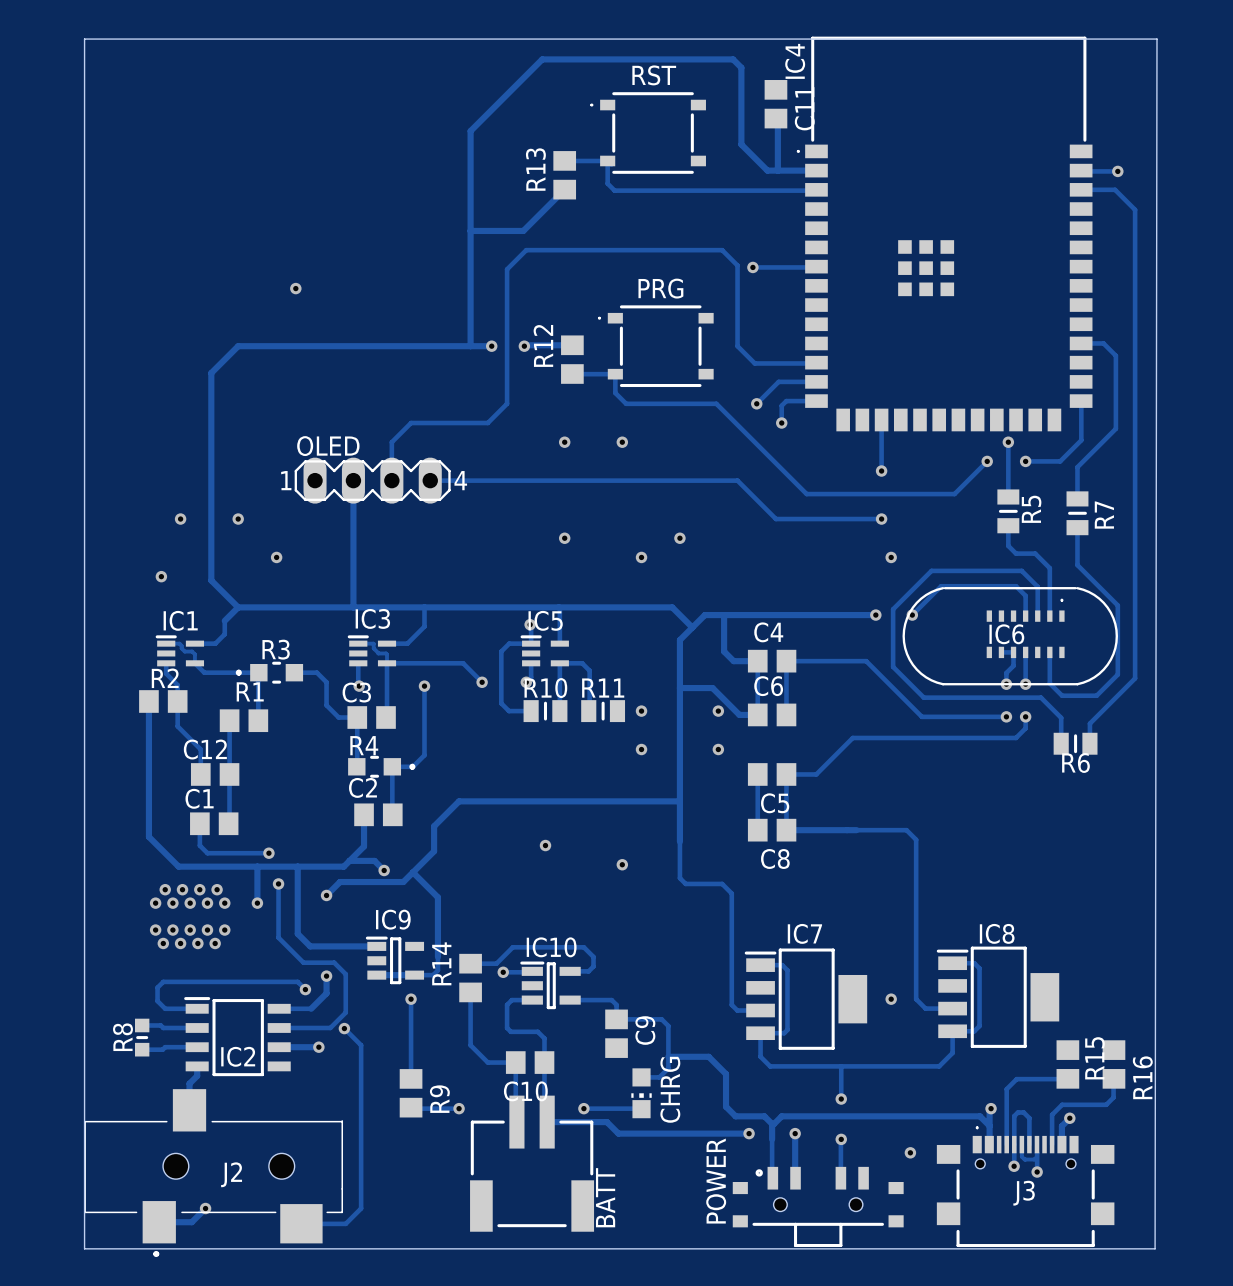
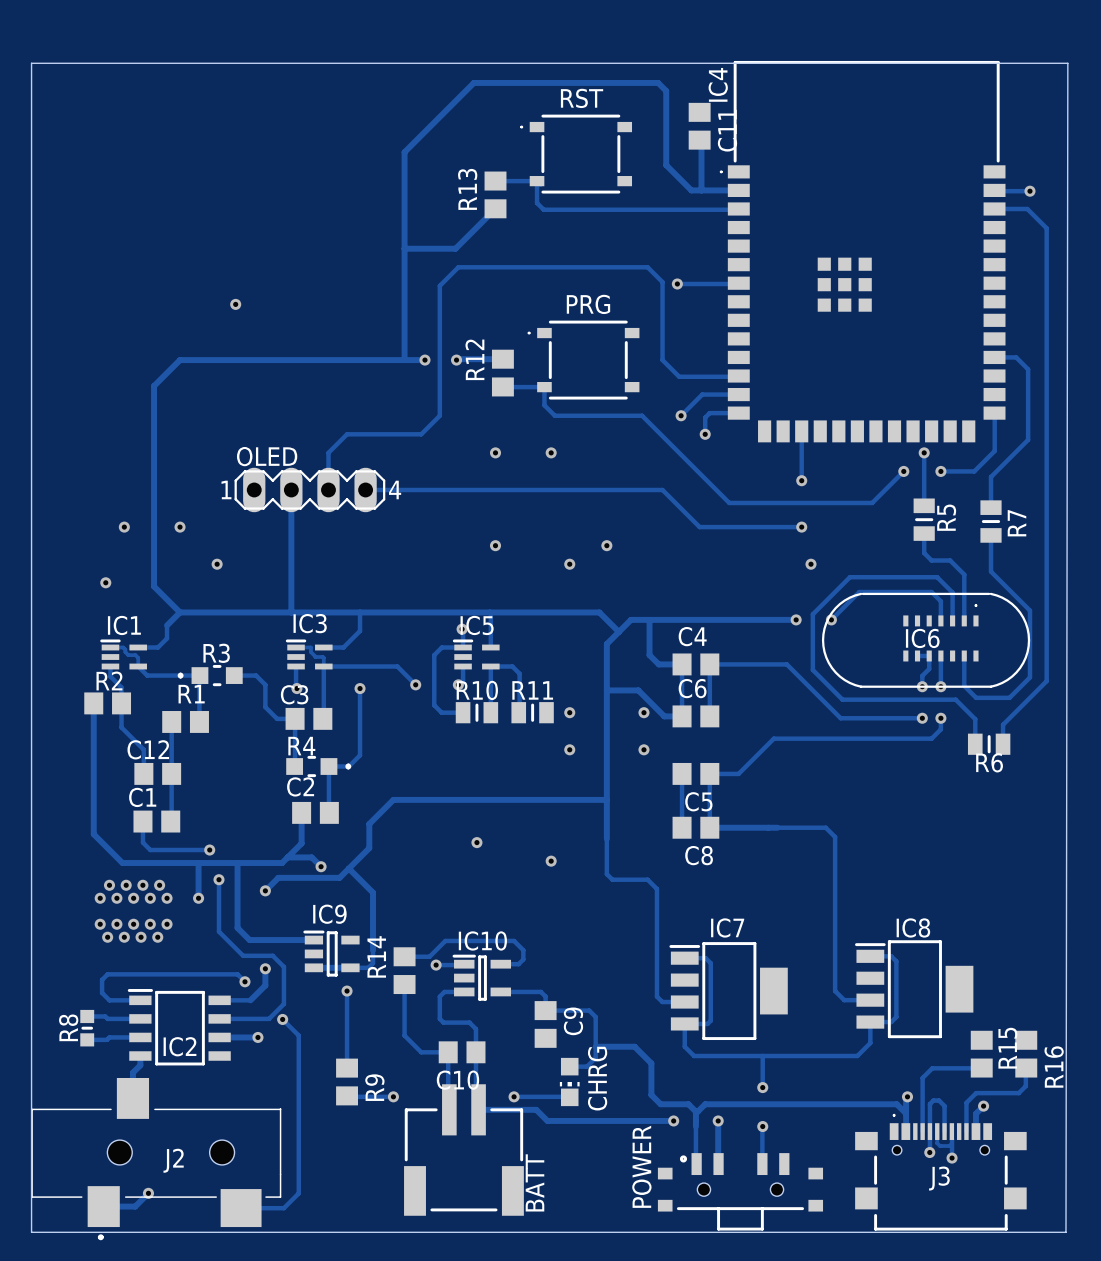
via: (891, 999) -> none
via: (910, 1152) -> none

